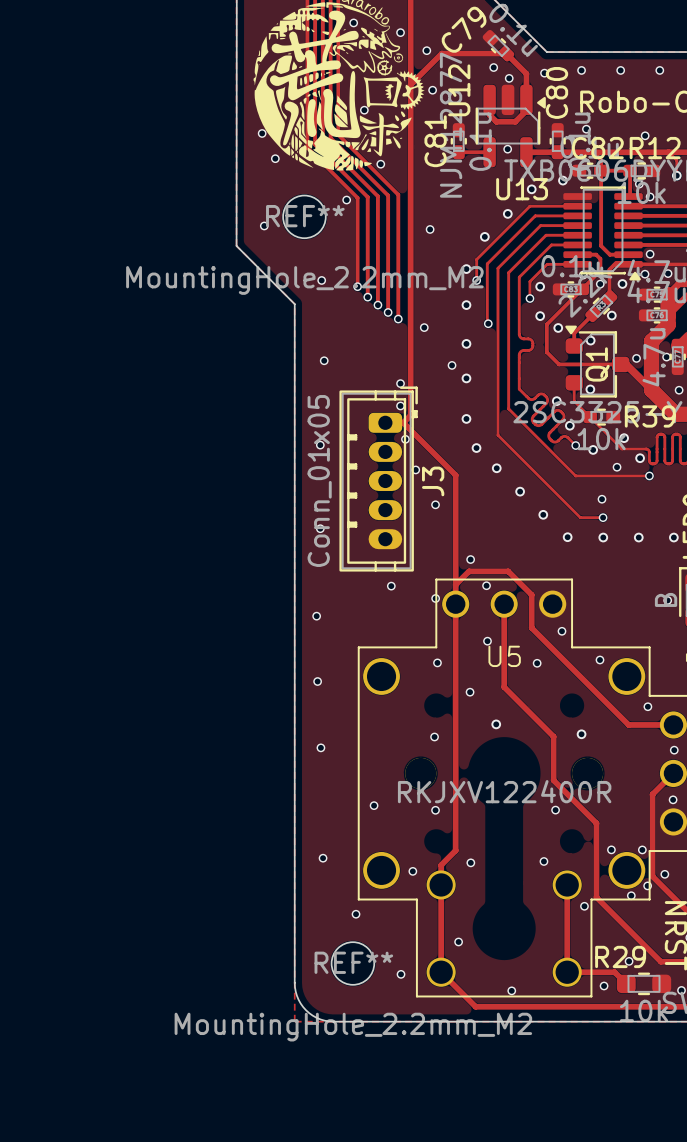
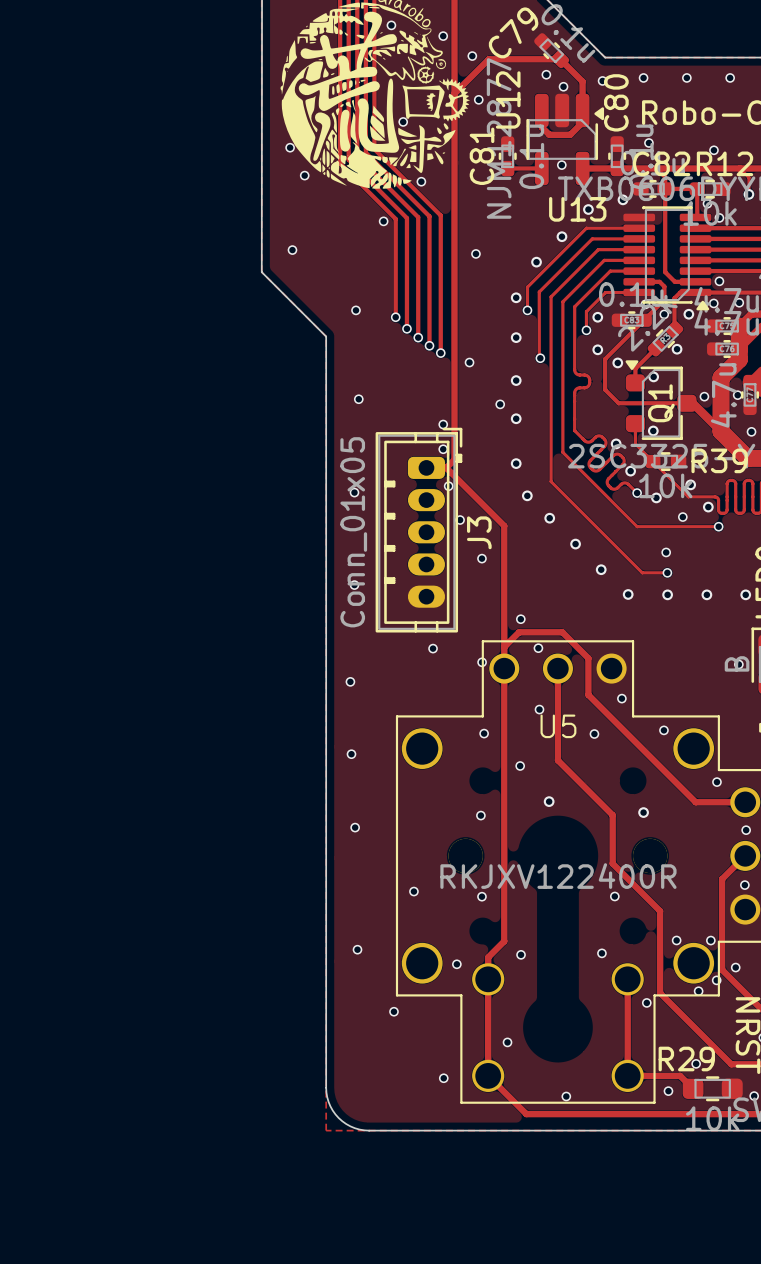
REF**: MountingHole_2.2mm_M2 (304, 216) -> none
REF**: MountingHole_2.2mm_M2 (352, 963) -> none

